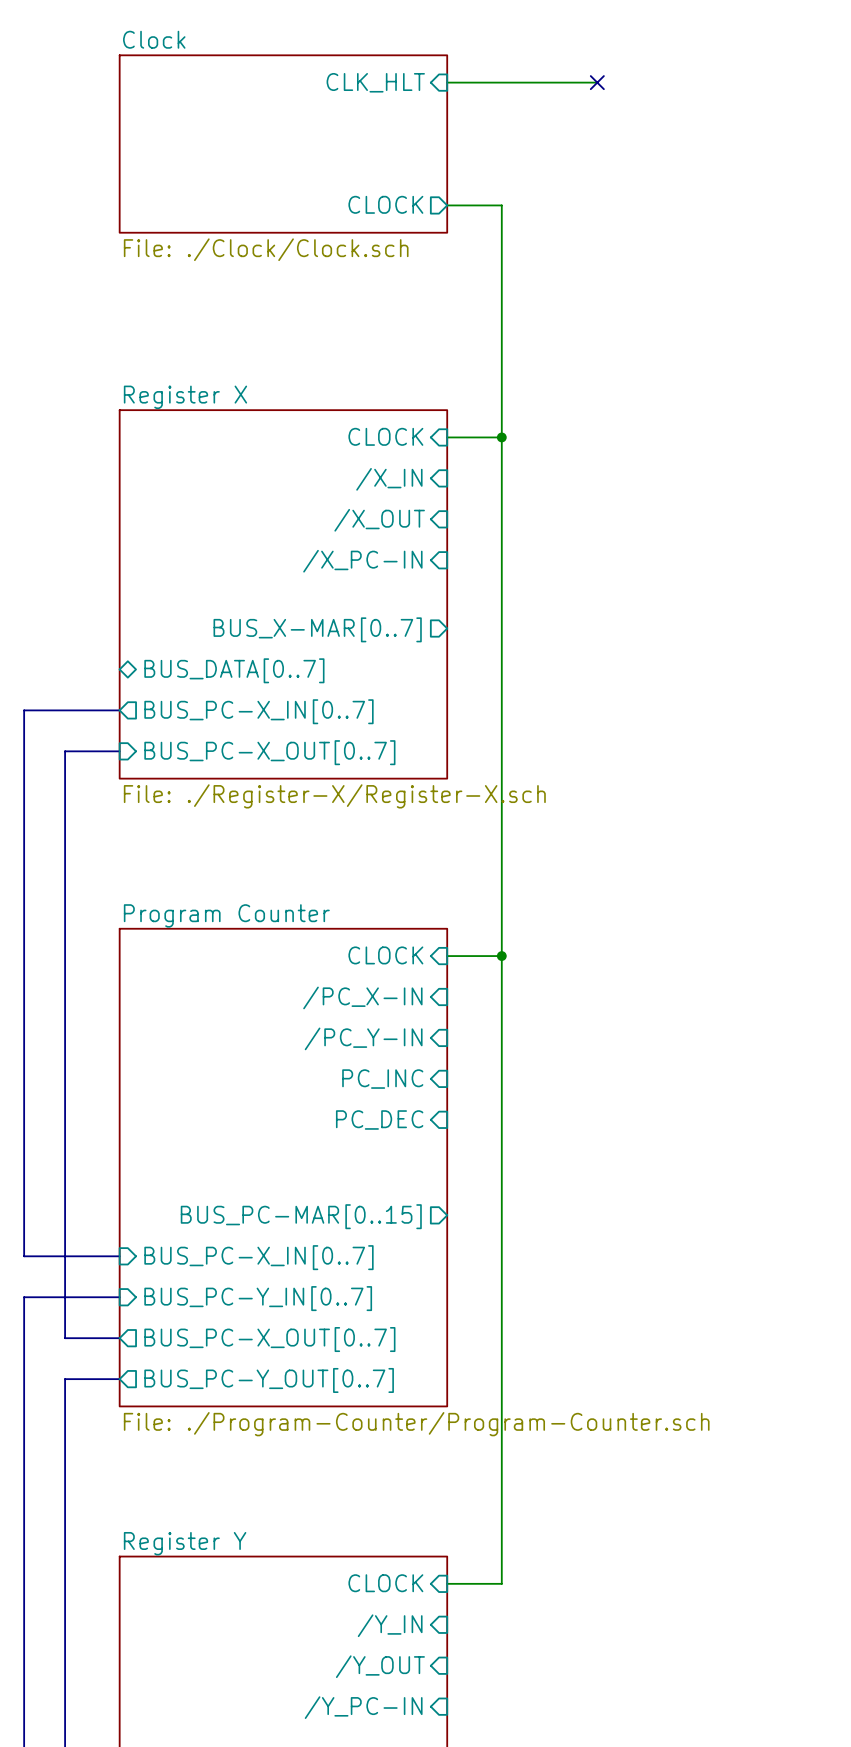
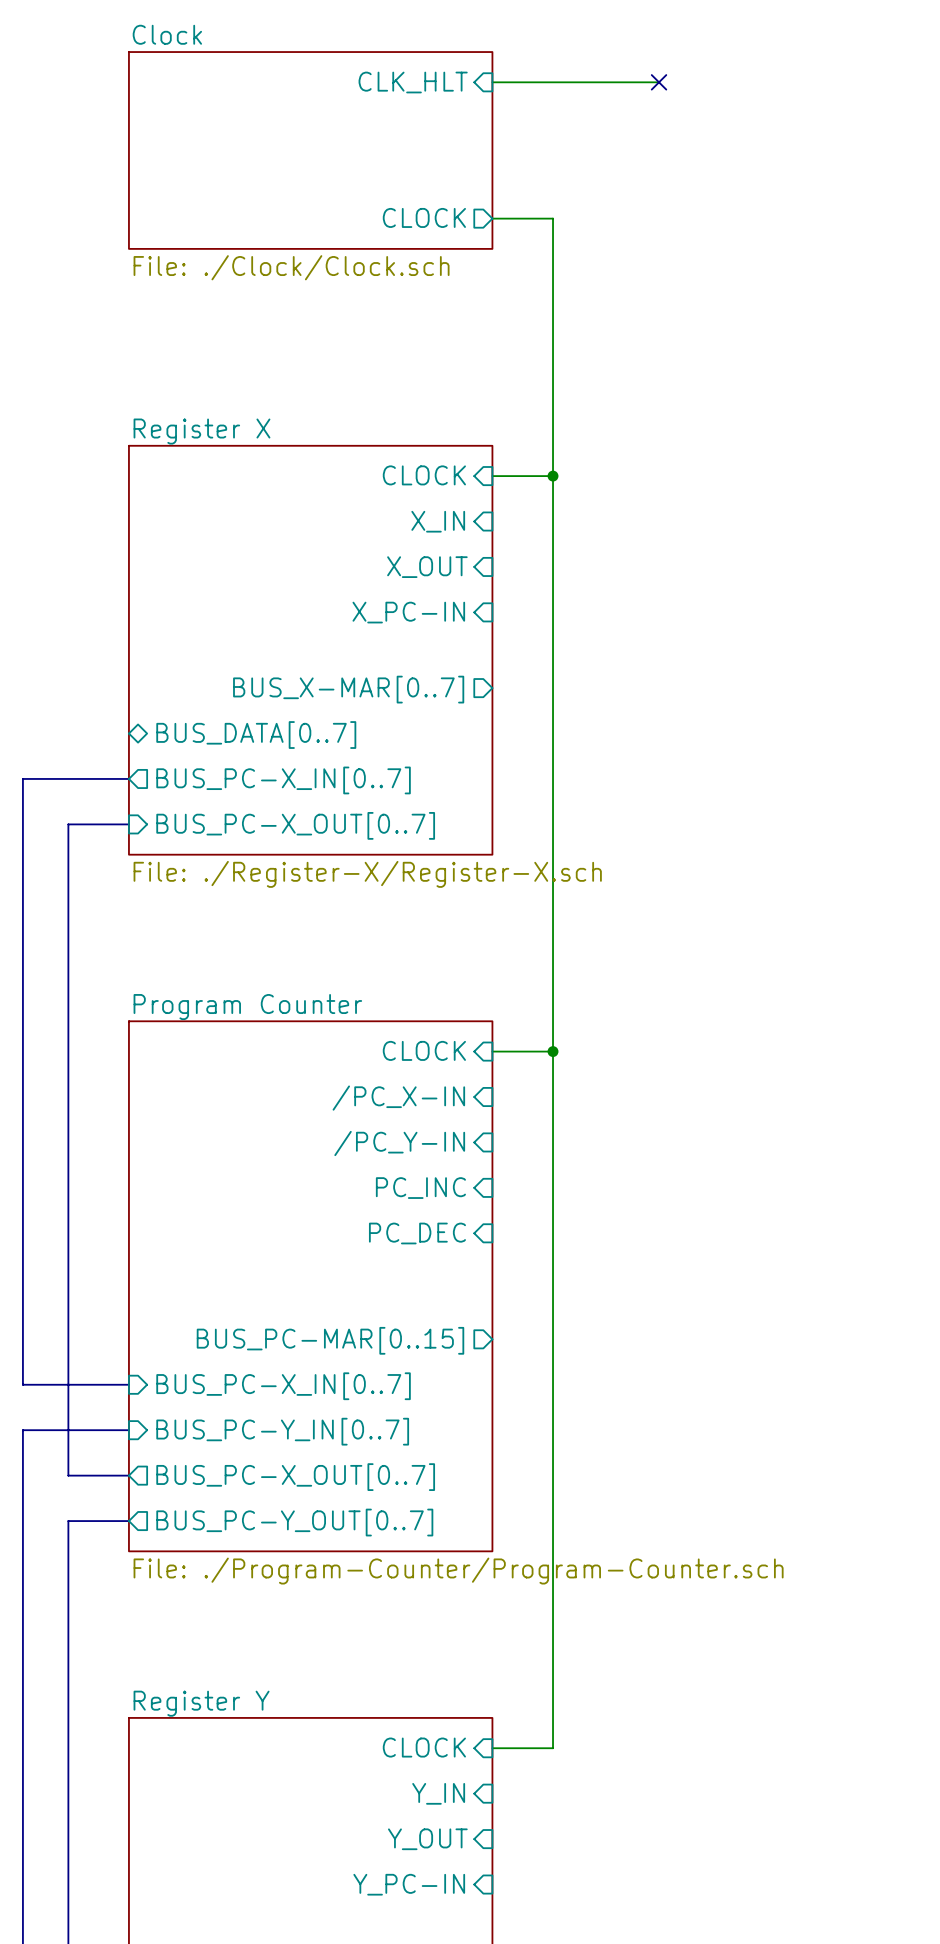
sheet pin: /X_IN (389, 479) -> X_IN (438, 521)
sheet pin: /X_OUT (379, 520) -> X_OUT (427, 567)
sheet pin: /X_PC-IN (362, 561) -> X_PC-IN (408, 612)
sheet pin: /Y_IN (390, 1625) -> Y_IN (438, 1793)
sheet pin: /Y_OUT (380, 1666) -> Y_OUT (427, 1839)
sheet pin: /Y_PC-IN (363, 1707) -> Y_PC-IN (409, 1884)

